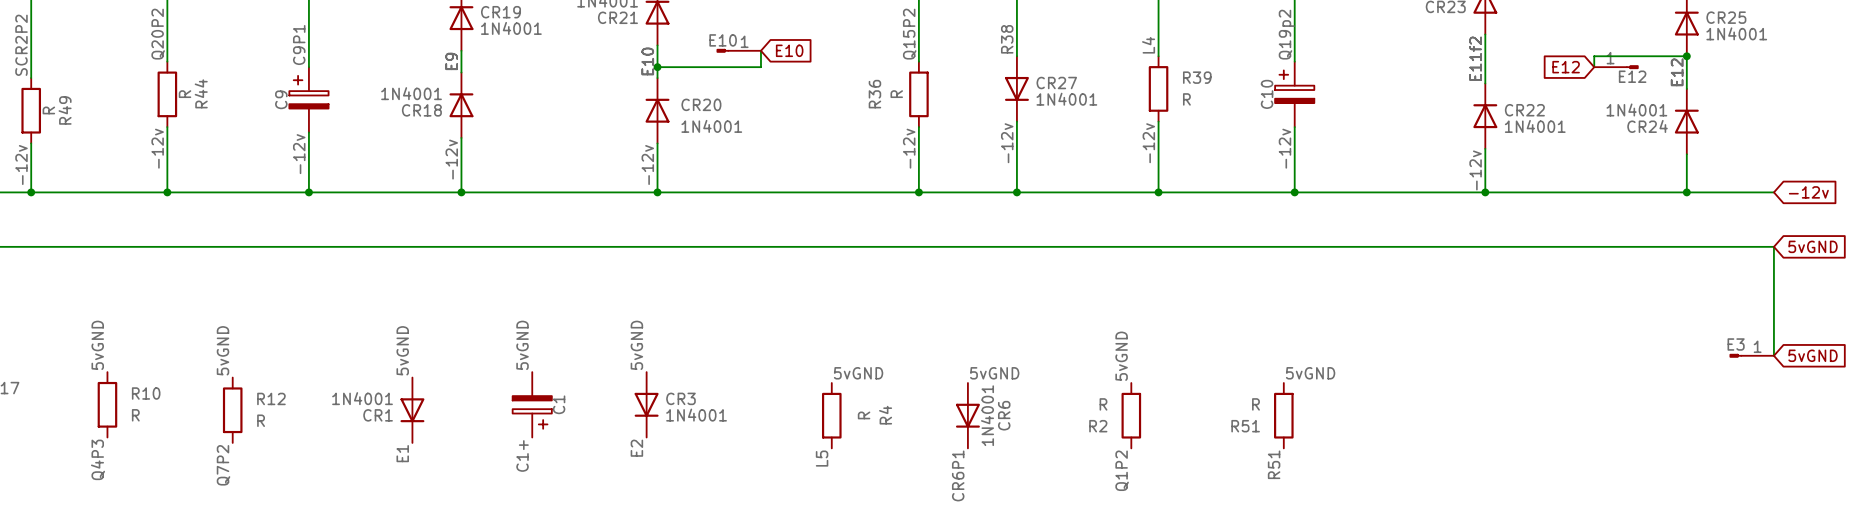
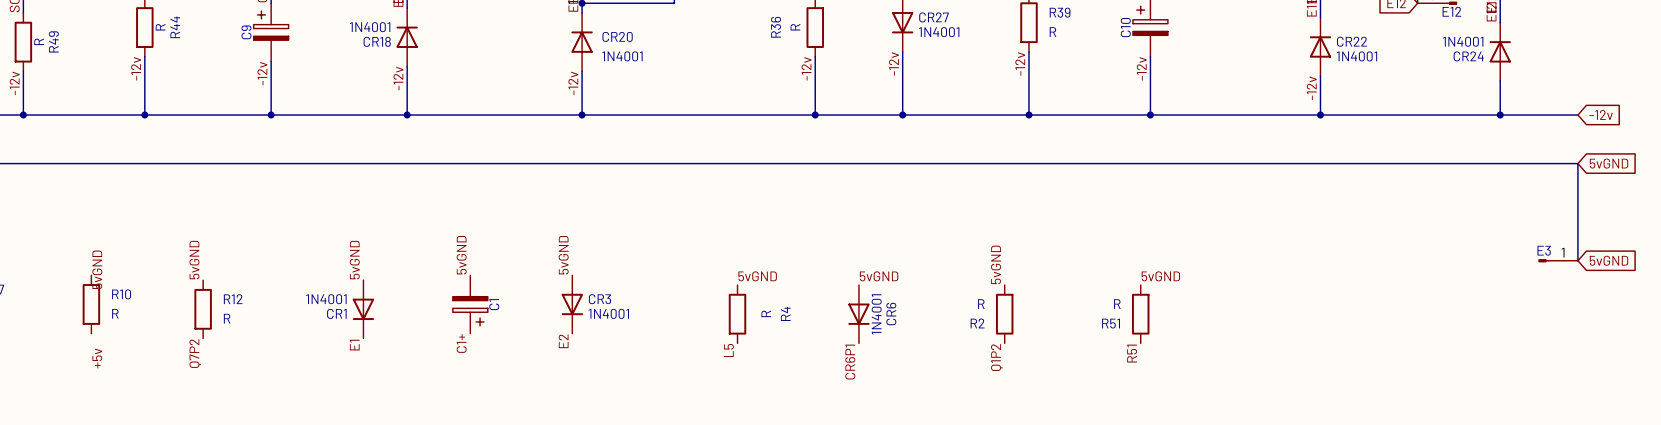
label position: 5vGND (97, 345) -> 5vGND (97, 269)
label: Q4P3 (97, 459) -> none
label: none -> +5v (97, 358)

